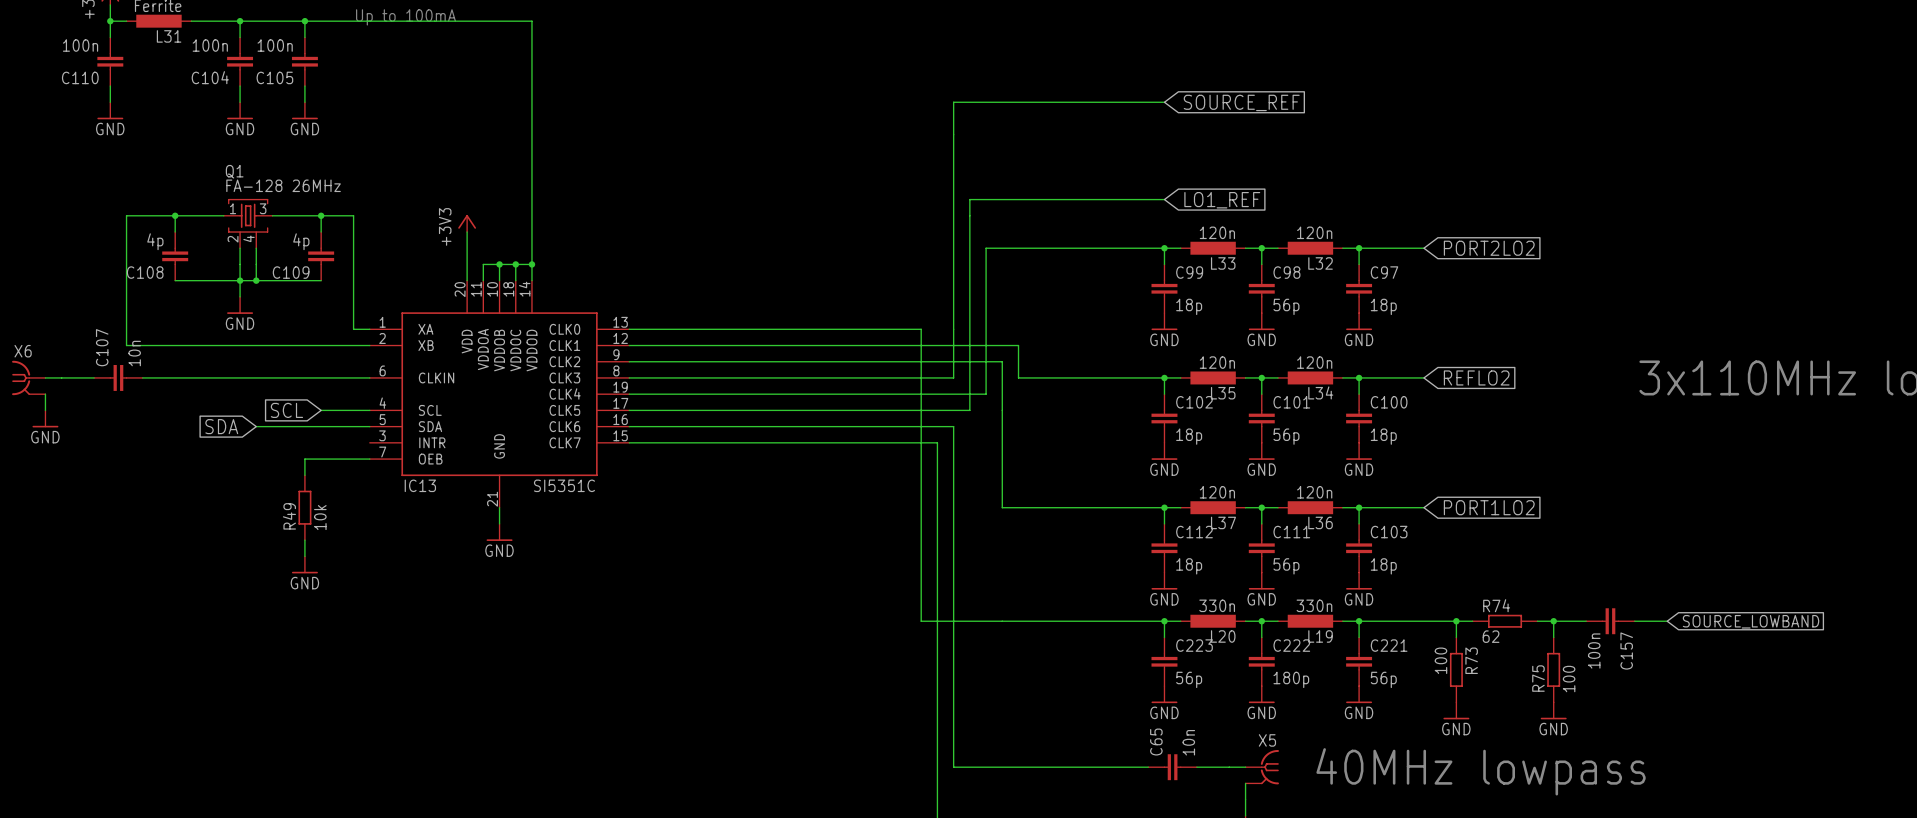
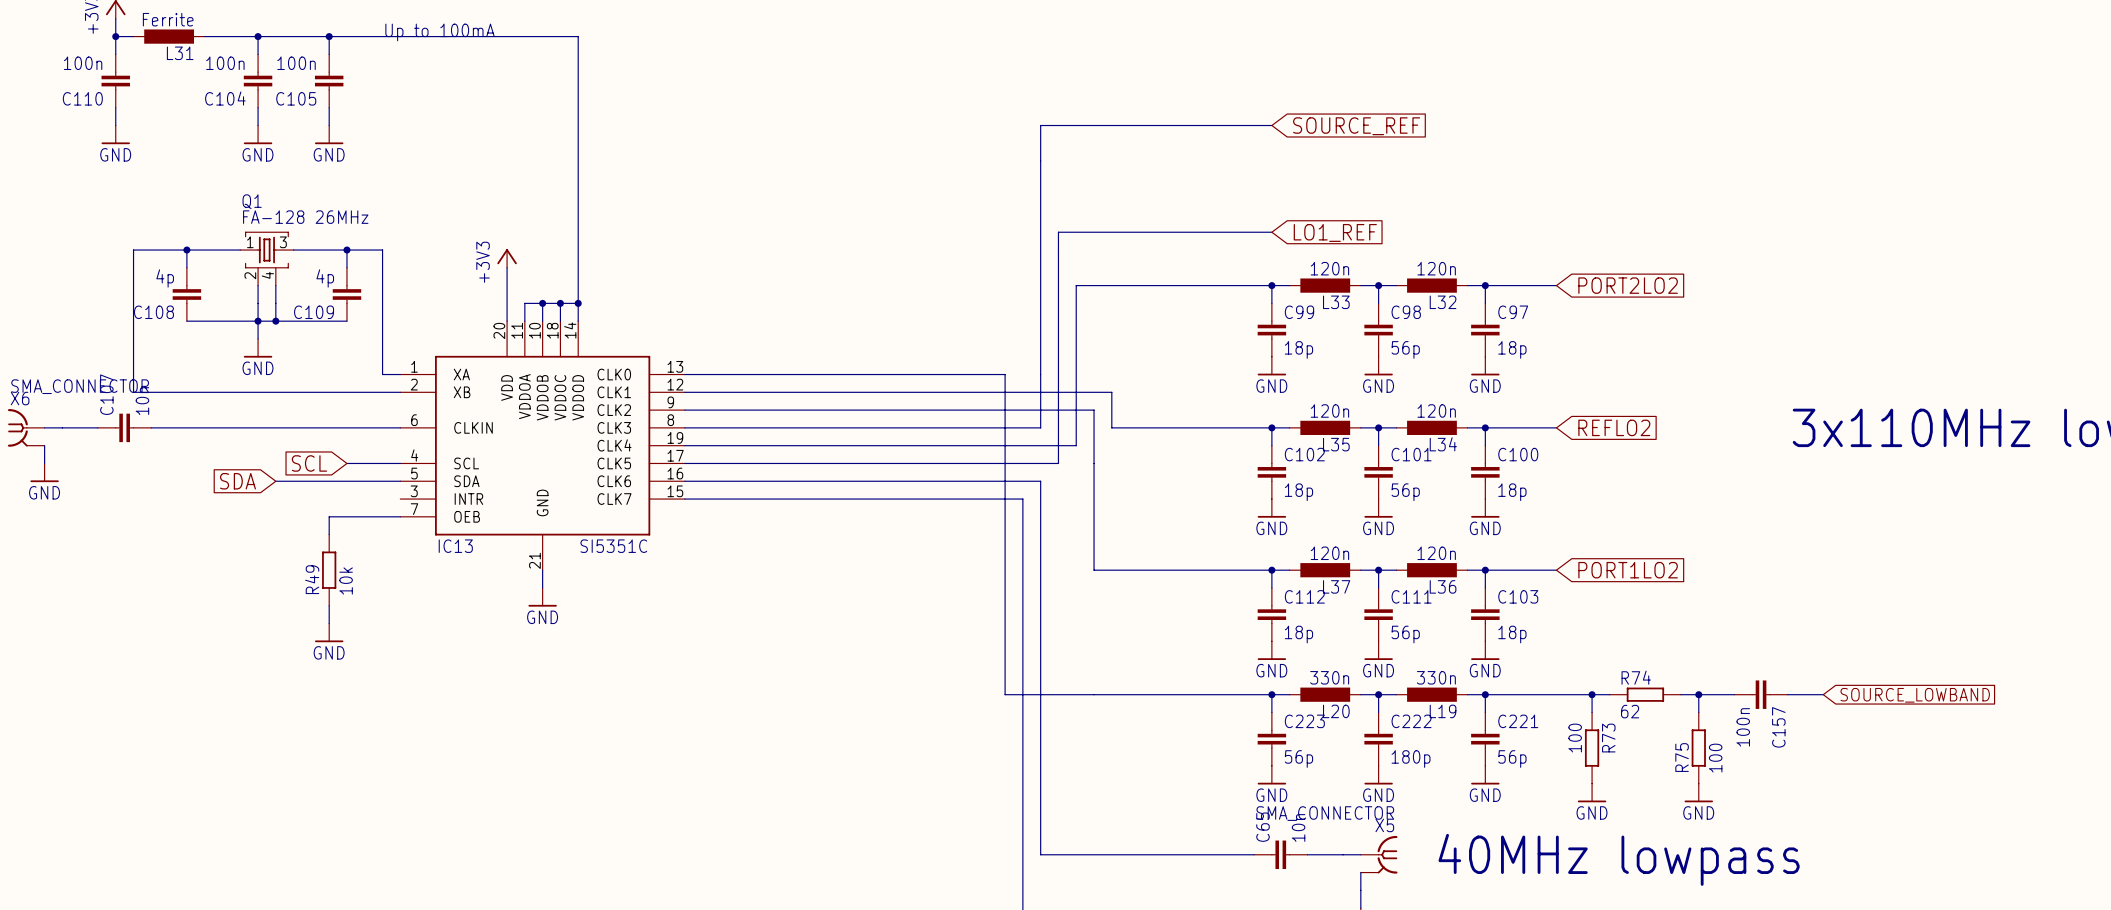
X6 value: none -> SMA_CONNECTOR (80, 386)
X5 value: none -> SMA_CONNECTOR (1325, 813)

